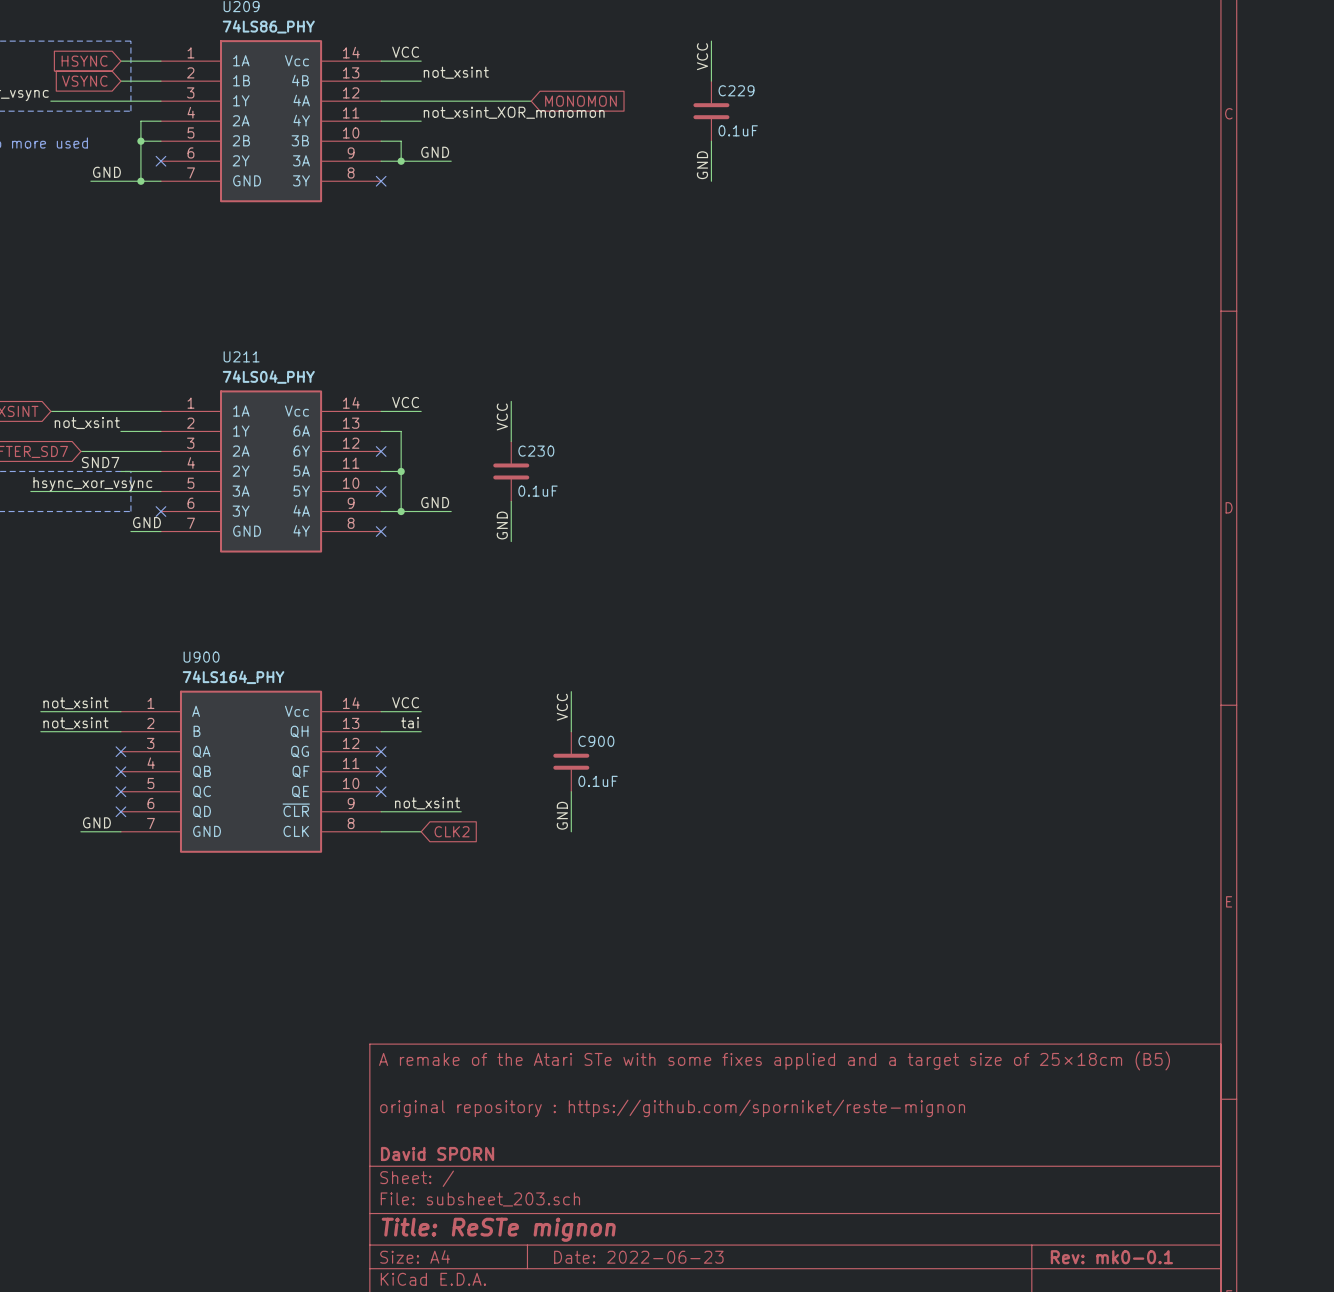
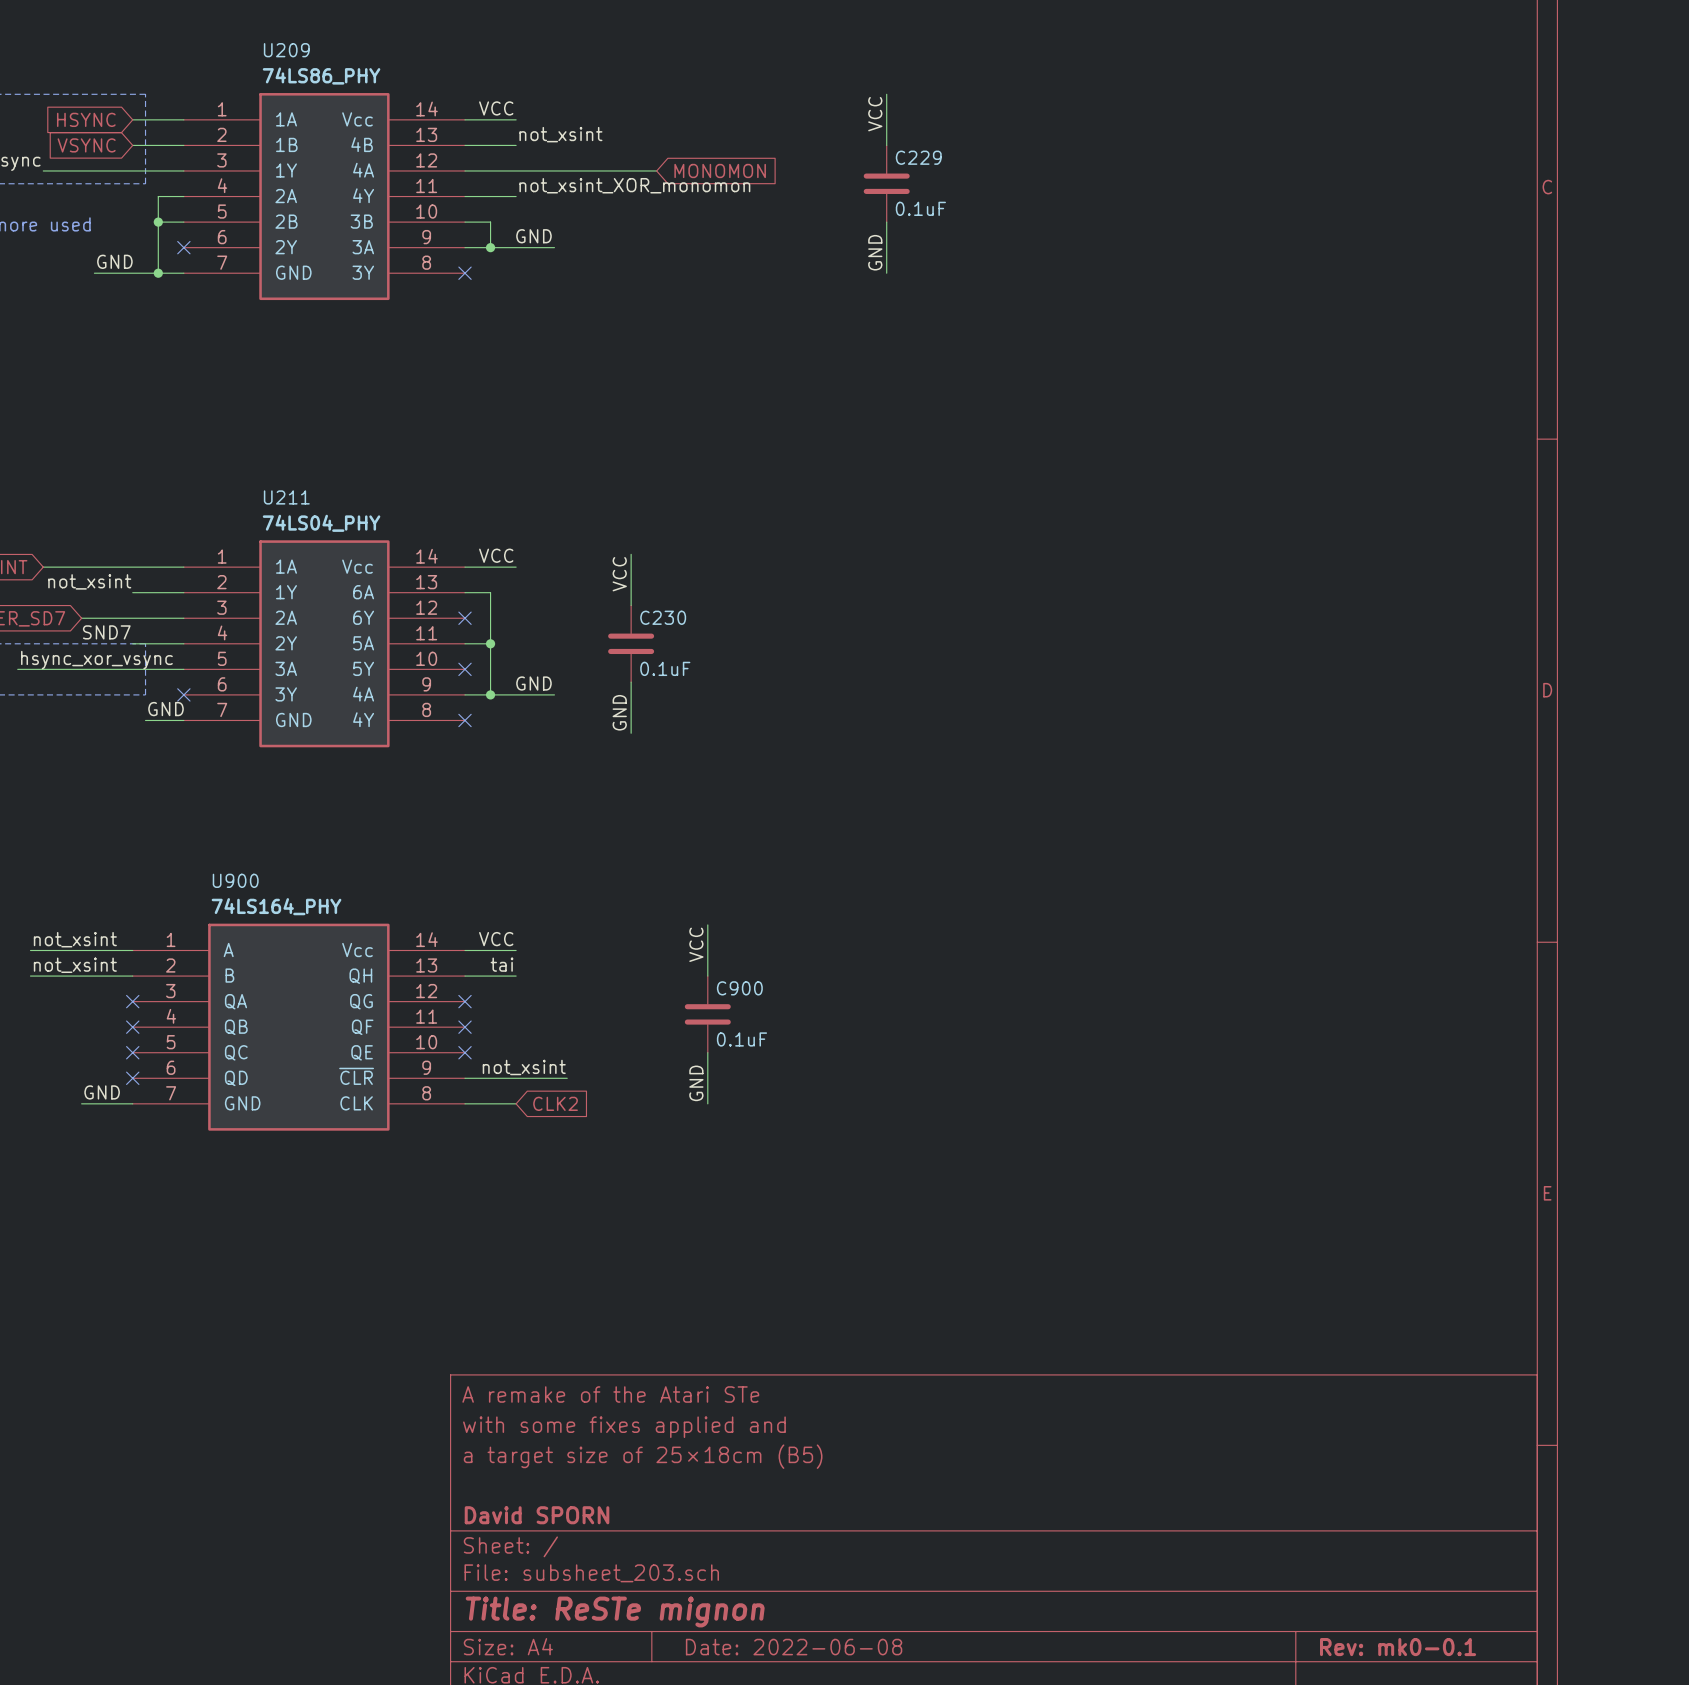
title block: A remake of the Atari STe with some fixes applied and a target size of 25×18cm (B5) (774, 1060) -> A remake of the Atari STe (610, 1394)
title block: none -> with some fixes applied and (624, 1427)
title block: original repository : https://github.com/sporniket/reste-mignon (672, 1108) -> a target size of 25×18cm (B5) (643, 1456)
title block: Date: 2022-06-23 (638, 1257) -> Date: 2022-06-08 (794, 1647)

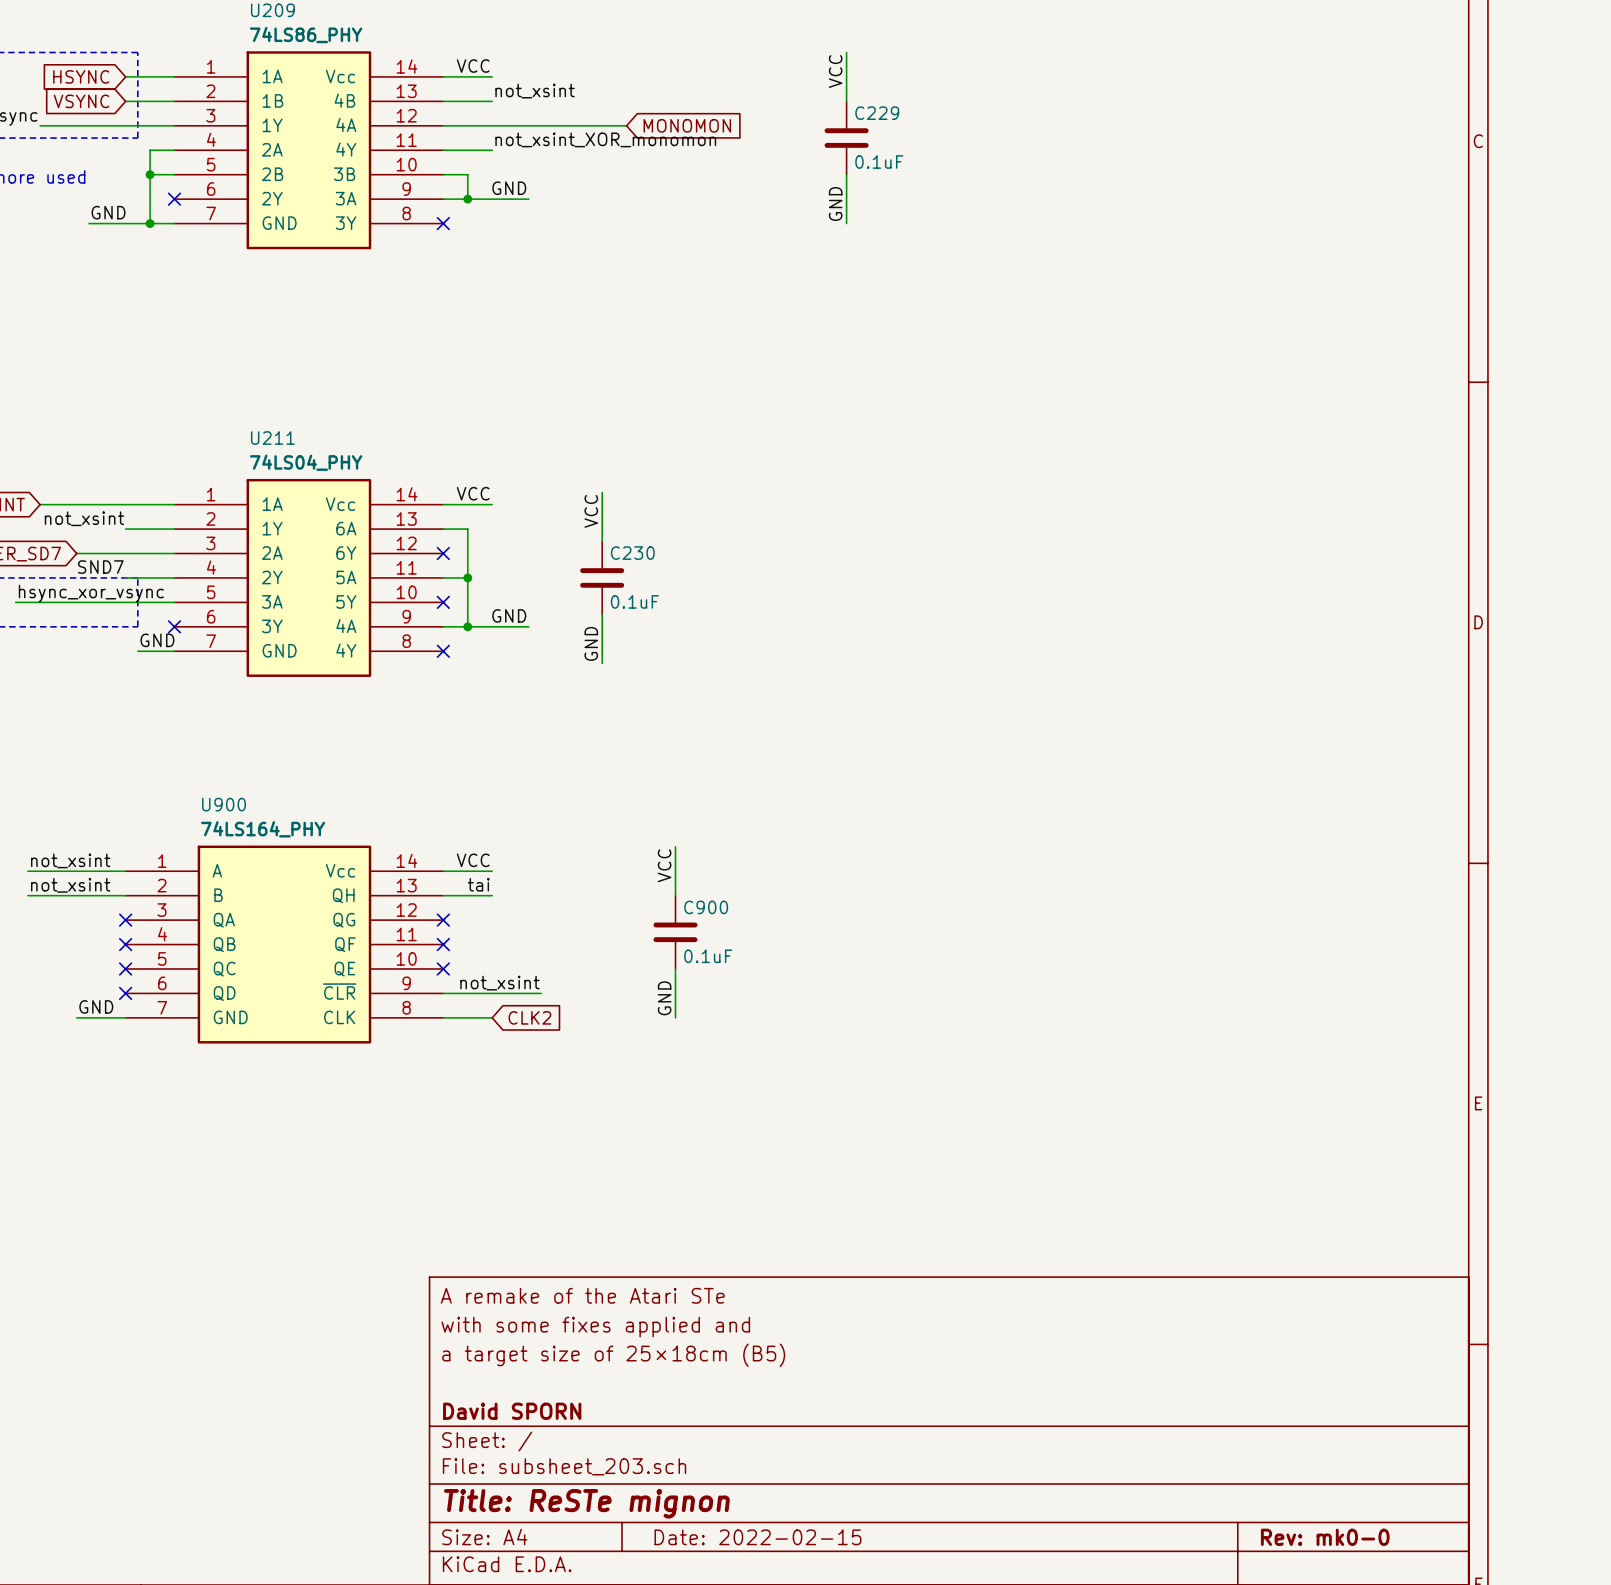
title block: Date: 2022-06-08 (794, 1647) -> Date: 2022-02-15 (757, 1537)
title block: Rev: mk0-0.1 (1398, 1647) -> Rev: mk0-0 (1325, 1537)

